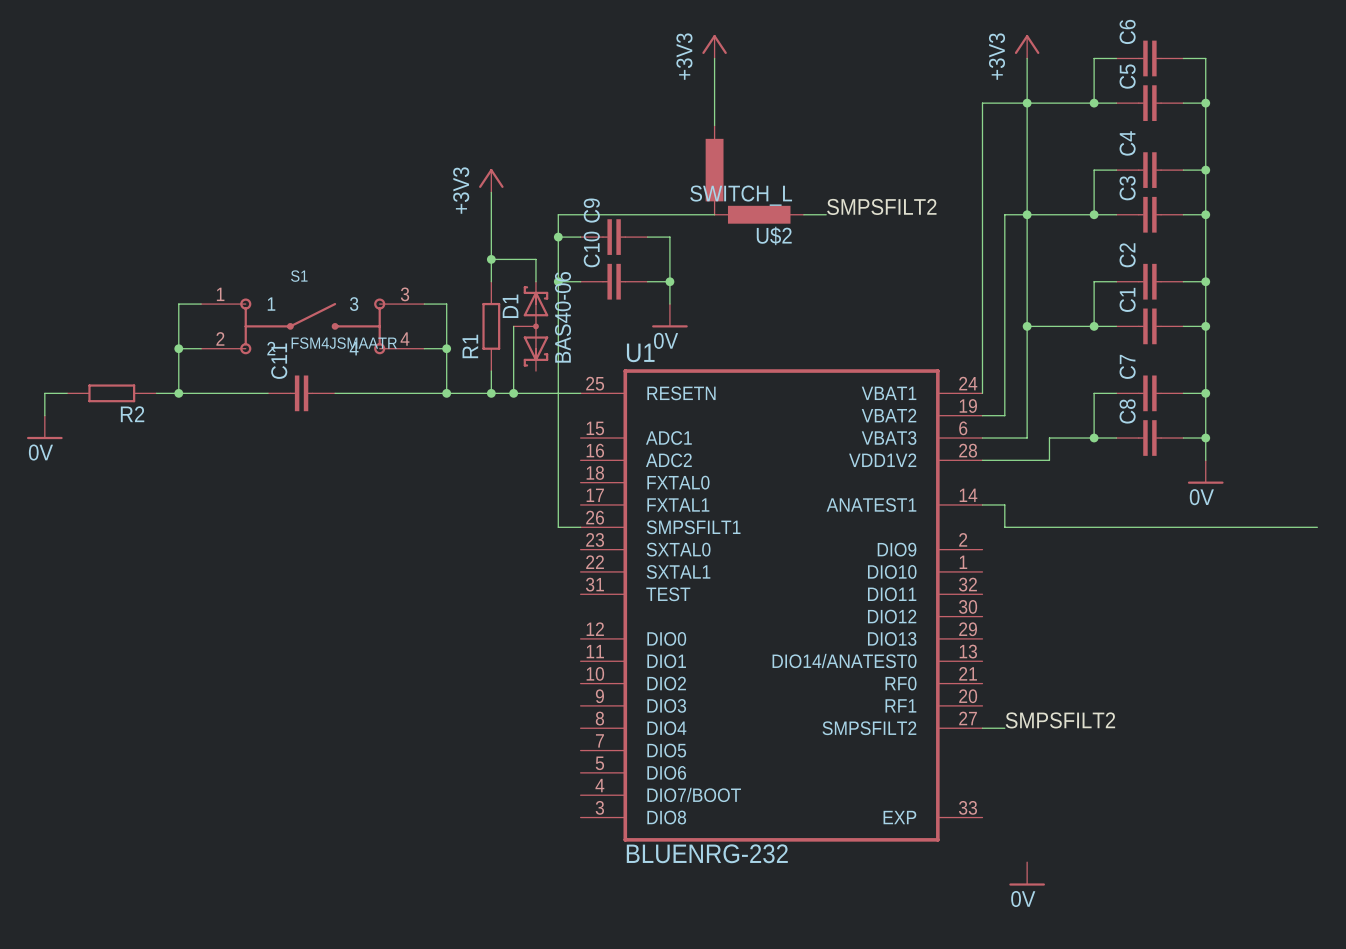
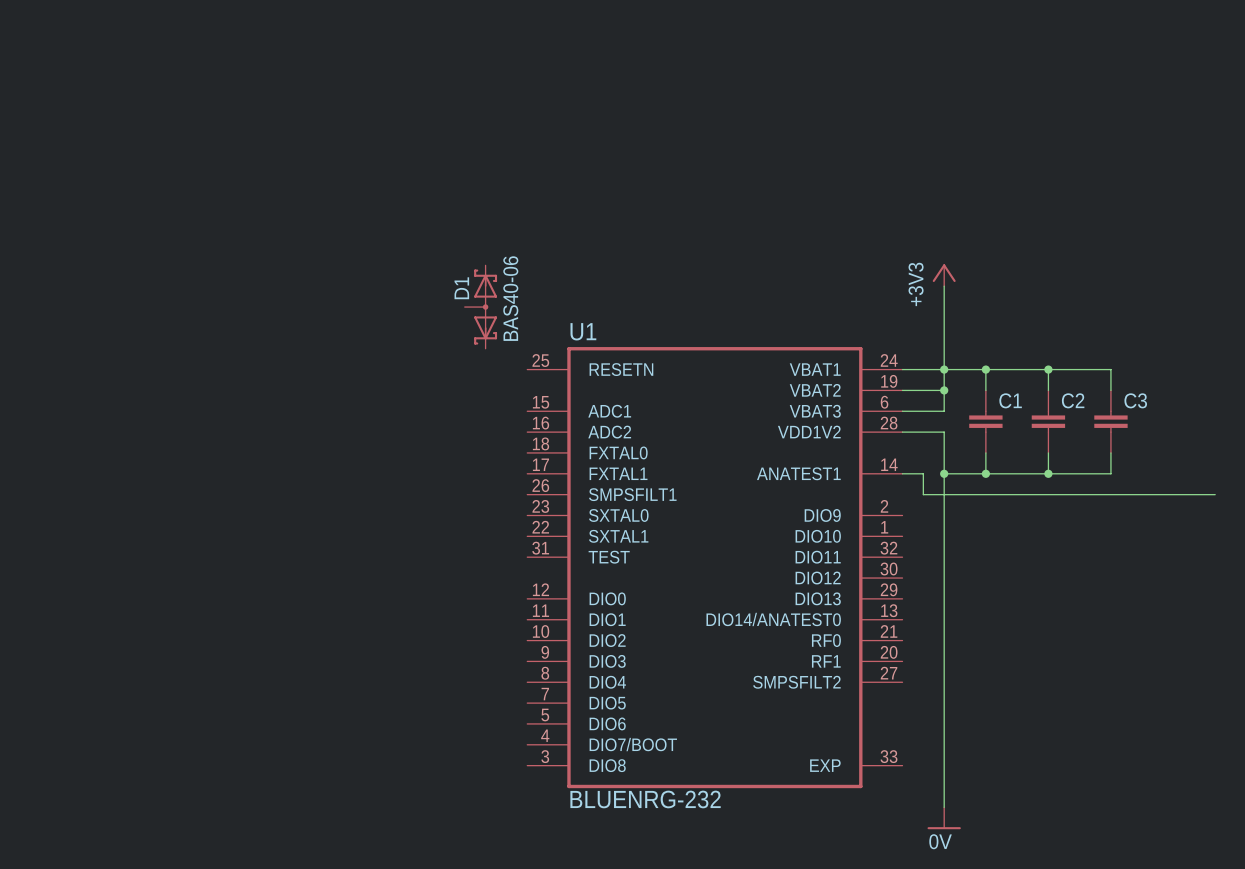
power symbol: +3V3 (714, 46) -> none
power symbol: +3V3 (1027, 46) -> none
wire: (714, 58) (714, 125) -> none
wire: (1027, 58) (1027, 304) -> none
wire: (1116, 58) (1094, 58) (1094, 103) -> none
C6: (1149, 58) -> none
wire: (1183, 58) (1205, 58) (1205, 393) -> none
junction: (1027, 103) -> none
junction: (1094, 103) -> none
wire: (1116, 103) (982, 103) (982, 393) -> none
C5: (1149, 103) -> none
wire: (1183, 103) (1205, 103) -> none
junction: (1205, 103) -> none
wire: (1116, 170) (1094, 170) (1094, 214) -> none
C4: (1149, 170) -> none
wire: (1183, 170) (1205, 170) -> none
junction: (1205, 170) -> none
U$2: SWITCH_L (754, 174) -> none
power symbol: +3V3 (491, 180) -> none
wire: (491, 192) (491, 281) -> none
label: SMPSFILT2 (881, 206) -> none
wire: (714, 214) (558, 214) (558, 527) (580, 527) -> none
wire: (803, 214) (826, 214) -> none
junction: (1027, 214) -> none
junction: (1094, 214) -> none
wire: (1116, 214) (1004, 214) (1004, 415) -> (944, 390) (923, 390)
C3 rotation: 0° (1149, 214) -> 90° clockwise (1110, 421)
C3 position: (1149, 214) -> (1110, 421)
wire: (1183, 214) (1205, 214) -> none
junction: (1205, 214) -> none
wire: (558, 237) (580, 237) -> none
junction: (558, 237) -> none
C9: (614, 237) -> none
wire: (647, 237) (669, 237) (669, 304) -> none
wire: (491, 259) (535, 259) (535, 281) -> none
junction: (491, 259) -> none
wire: (558, 281) (580, 281) -> none
junction: (558, 281) -> none
C10: (614, 281) -> none
wire: (647, 281) (669, 281) -> none
junction: (669, 281) -> none
wire: (1116, 281) (1094, 281) (1094, 326) -> none
C2 rotation: 0° (1149, 281) -> 90° clockwise (1048, 421)
C2 position: (1149, 281) -> (1048, 421)
wire: (1183, 281) (1205, 281) -> none
junction: (1205, 281) -> none
power symbol: none -> +3V3 (944, 275)
wire: (201, 304) (178, 304) (178, 393) -> none
wire: (424, 304) (446, 304) (446, 393) -> none
power symbol: 0V (669, 315) -> none
S1: FSM4JSMAATR (312, 326) -> none
R1: (491, 326) -> none
wire: (513, 326) (513, 393) -> none
wire: (1027, 326) (1116, 326) -> none
junction: (1027, 326) -> none
junction: (1094, 326) -> none
C1 rotation: 0° (1149, 326) -> 90° clockwise (985, 421)
C1 position: (1149, 326) -> (985, 421)
wire: (1183, 326) (1205, 326) -> none
junction: (1205, 326) -> none
wire: (178, 348) (201, 348) -> none
junction: (178, 348) -> none
wire: (424, 348) (446, 348) -> none
junction: (446, 348) -> none
wire: (491, 371) (491, 393) -> none
wire: (67, 393) (44, 393) (44, 415) -> none
R2: (111, 393) -> none
wire: (156, 393) (268, 393) -> none
junction: (178, 393) -> none
C11: (301, 393) -> none
wire: (335, 393) (580, 393) -> none
junction: (446, 393) -> none
junction: (491, 393) -> none
junction: (513, 393) -> none
junction: none -> (944, 369)
wire: none -> (985, 369) (985, 390)
junction: none -> (985, 369)
wire: (1094, 393) (1094, 438) -> (1006, 369) (902, 369)
wire: none -> (1048, 369) (1048, 390)
junction: none -> (1048, 369)
C7: (1149, 393) -> none
junction: (1205, 393) -> none
junction: none -> (944, 390)
power symbol: 0V (44, 427) -> none
junction: (1094, 438) -> none
wire: (1116, 438) (1049, 438) (1049, 460) (1027, 460) -> (944, 807) (944, 432)
C8: (1149, 438) -> none
wire: (1183, 438) (1205, 438) -> none
junction: (1205, 438) -> none
power symbol: 0V (1205, 472) -> none
wire: none -> (985, 452) (985, 473)
wire: none -> (1048, 452) (1048, 473)
wire: none -> (1110, 452) (1110, 473) (944, 473)
junction: none -> (944, 473)
junction: none -> (985, 473)
junction: none -> (1048, 473)
label: SMPSFILT2 (1060, 720) -> none
wire: (982, 728) (1004, 728) -> none

